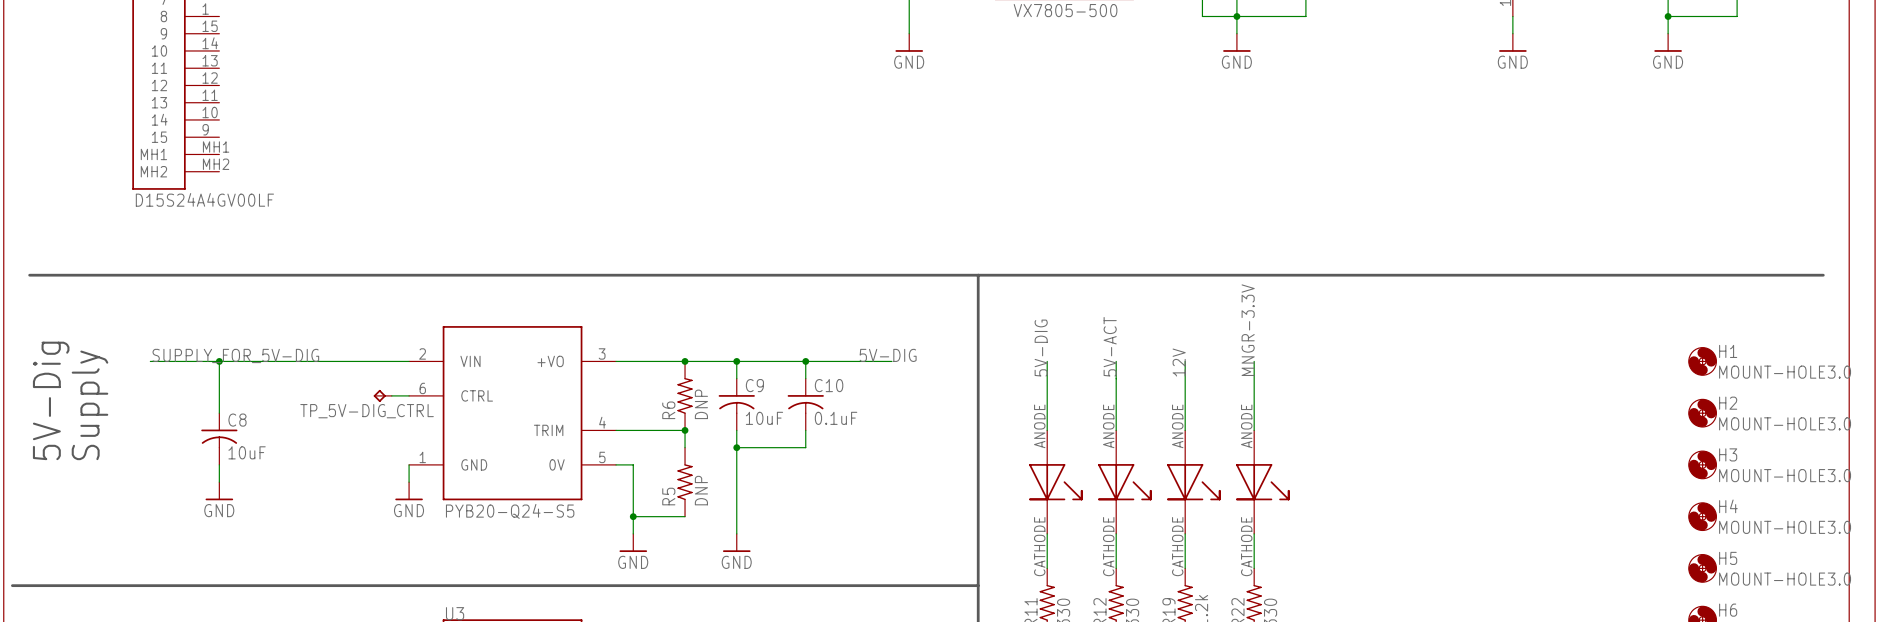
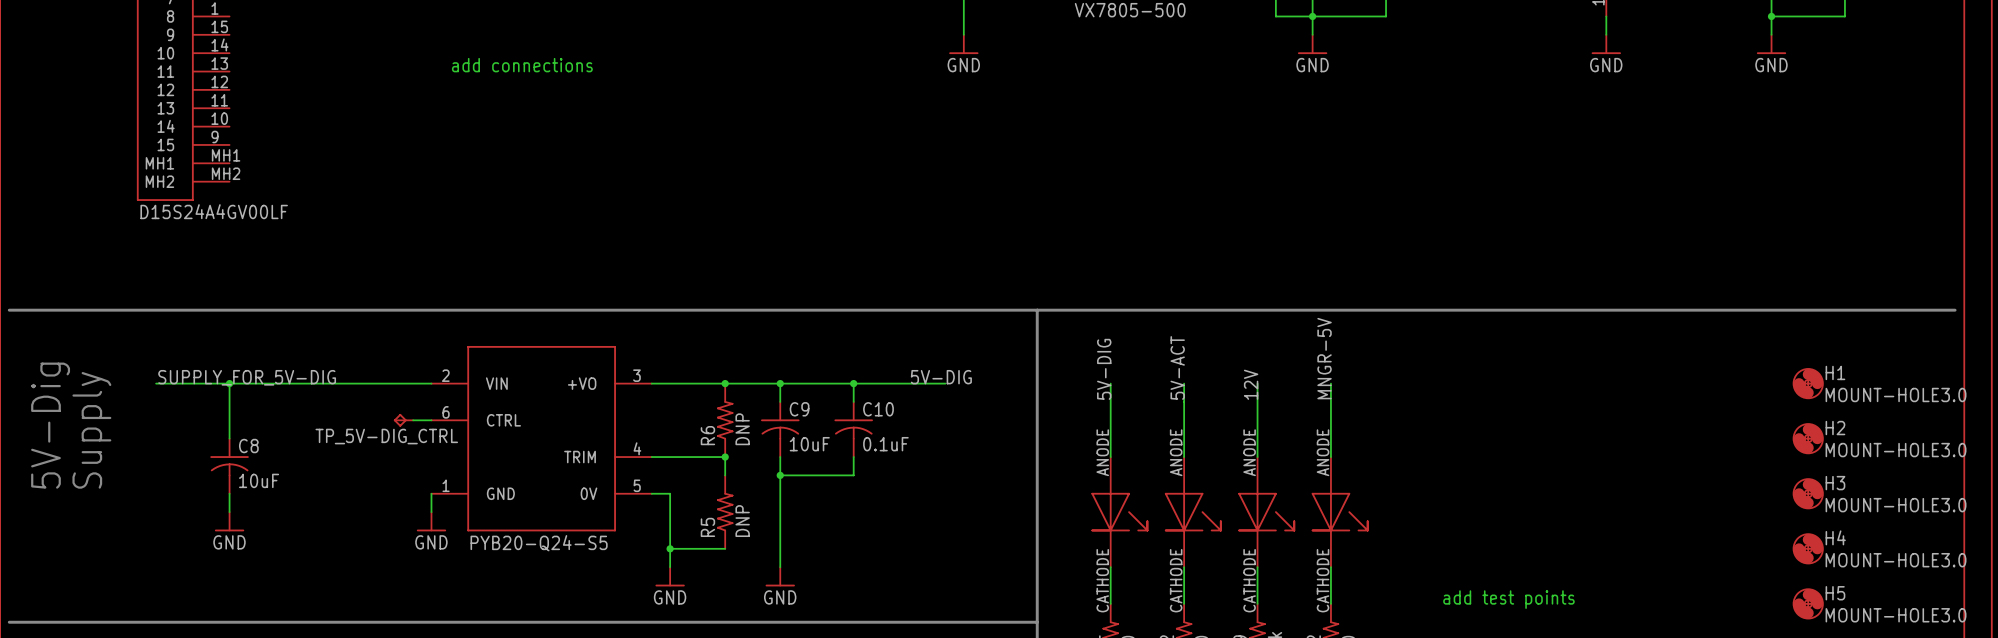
text: none -> add connections (522, 65)
line: (29, 275) (1823, 275) -> none
line: (978, 275) (978, 292) -> none
line: none -> (9, 310) (1955, 310)
label: MNGR-3.3V (1248, 330) -> MNGR-5V (1324, 358)
text: none -> add test points (1508, 599)

